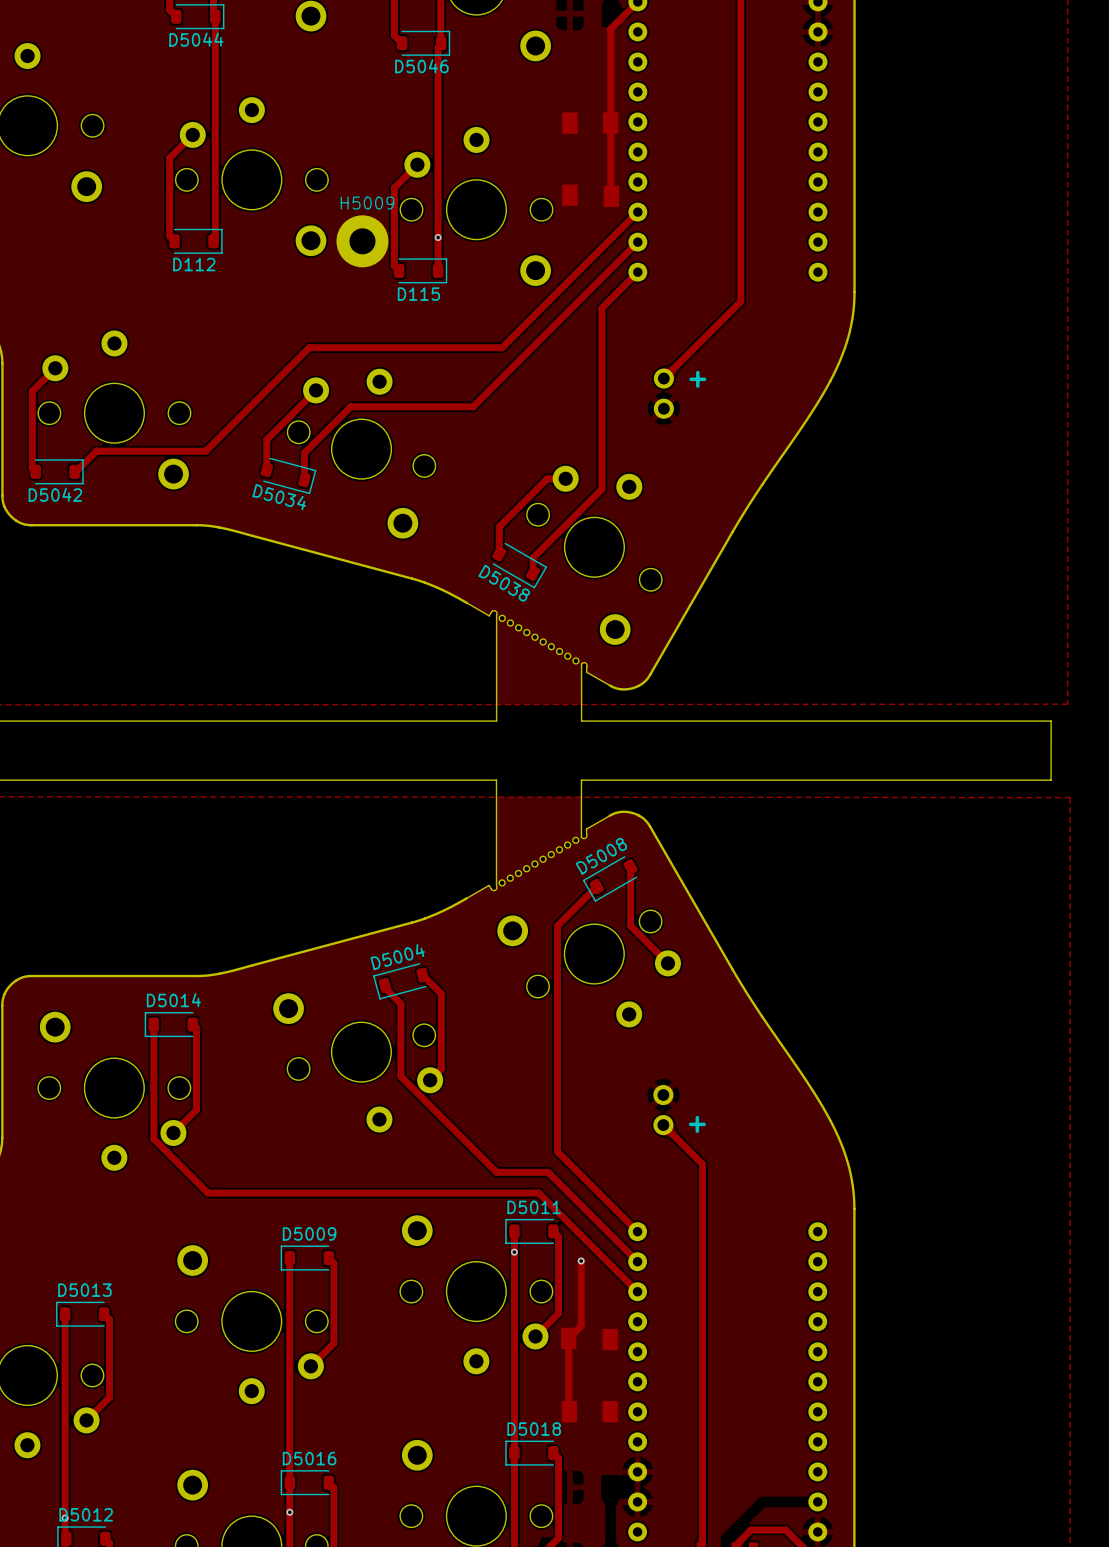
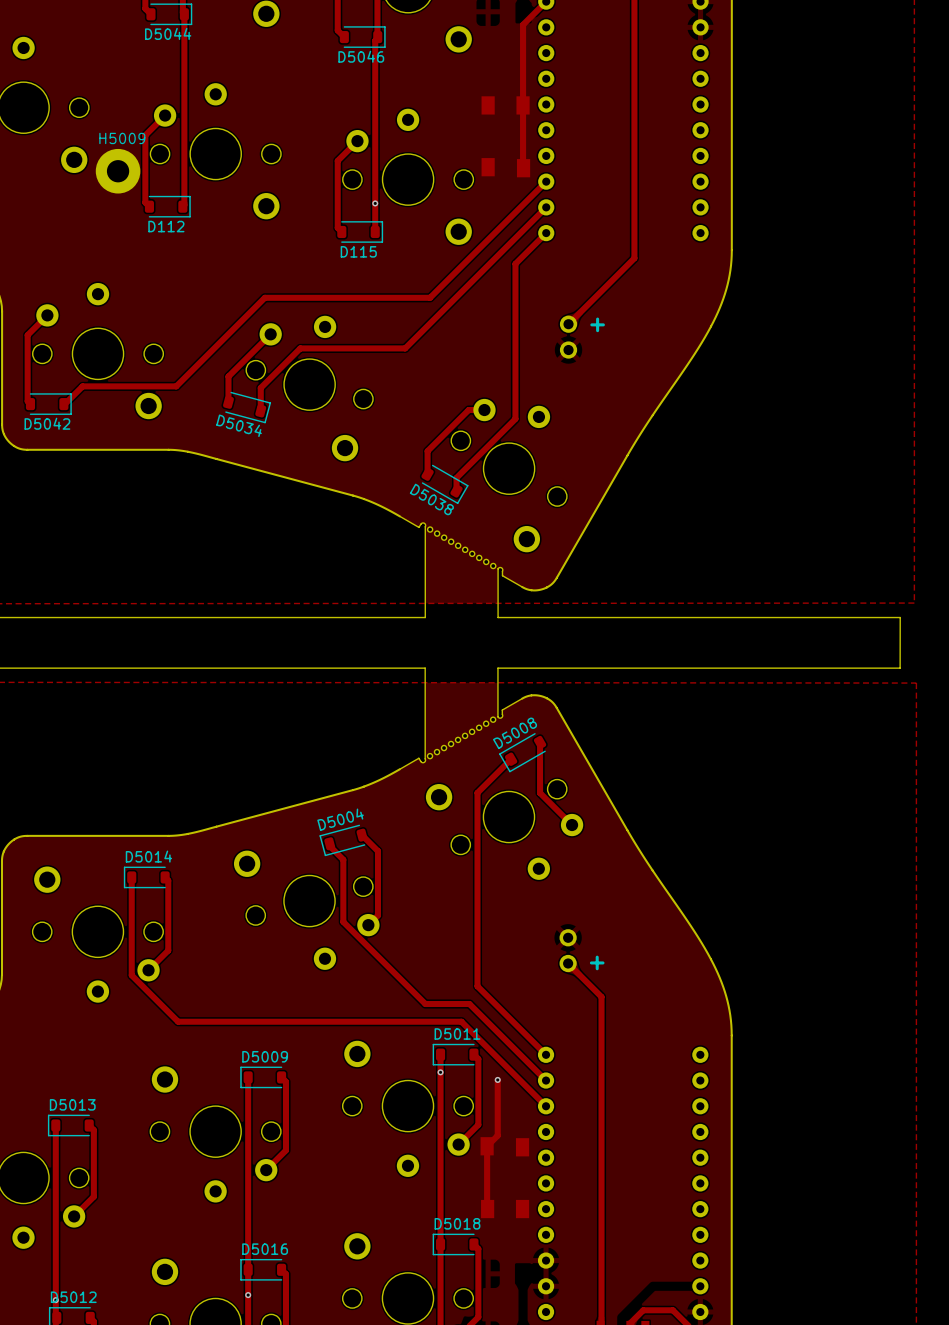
H5009 position: (362, 241) -> (118, 171)

